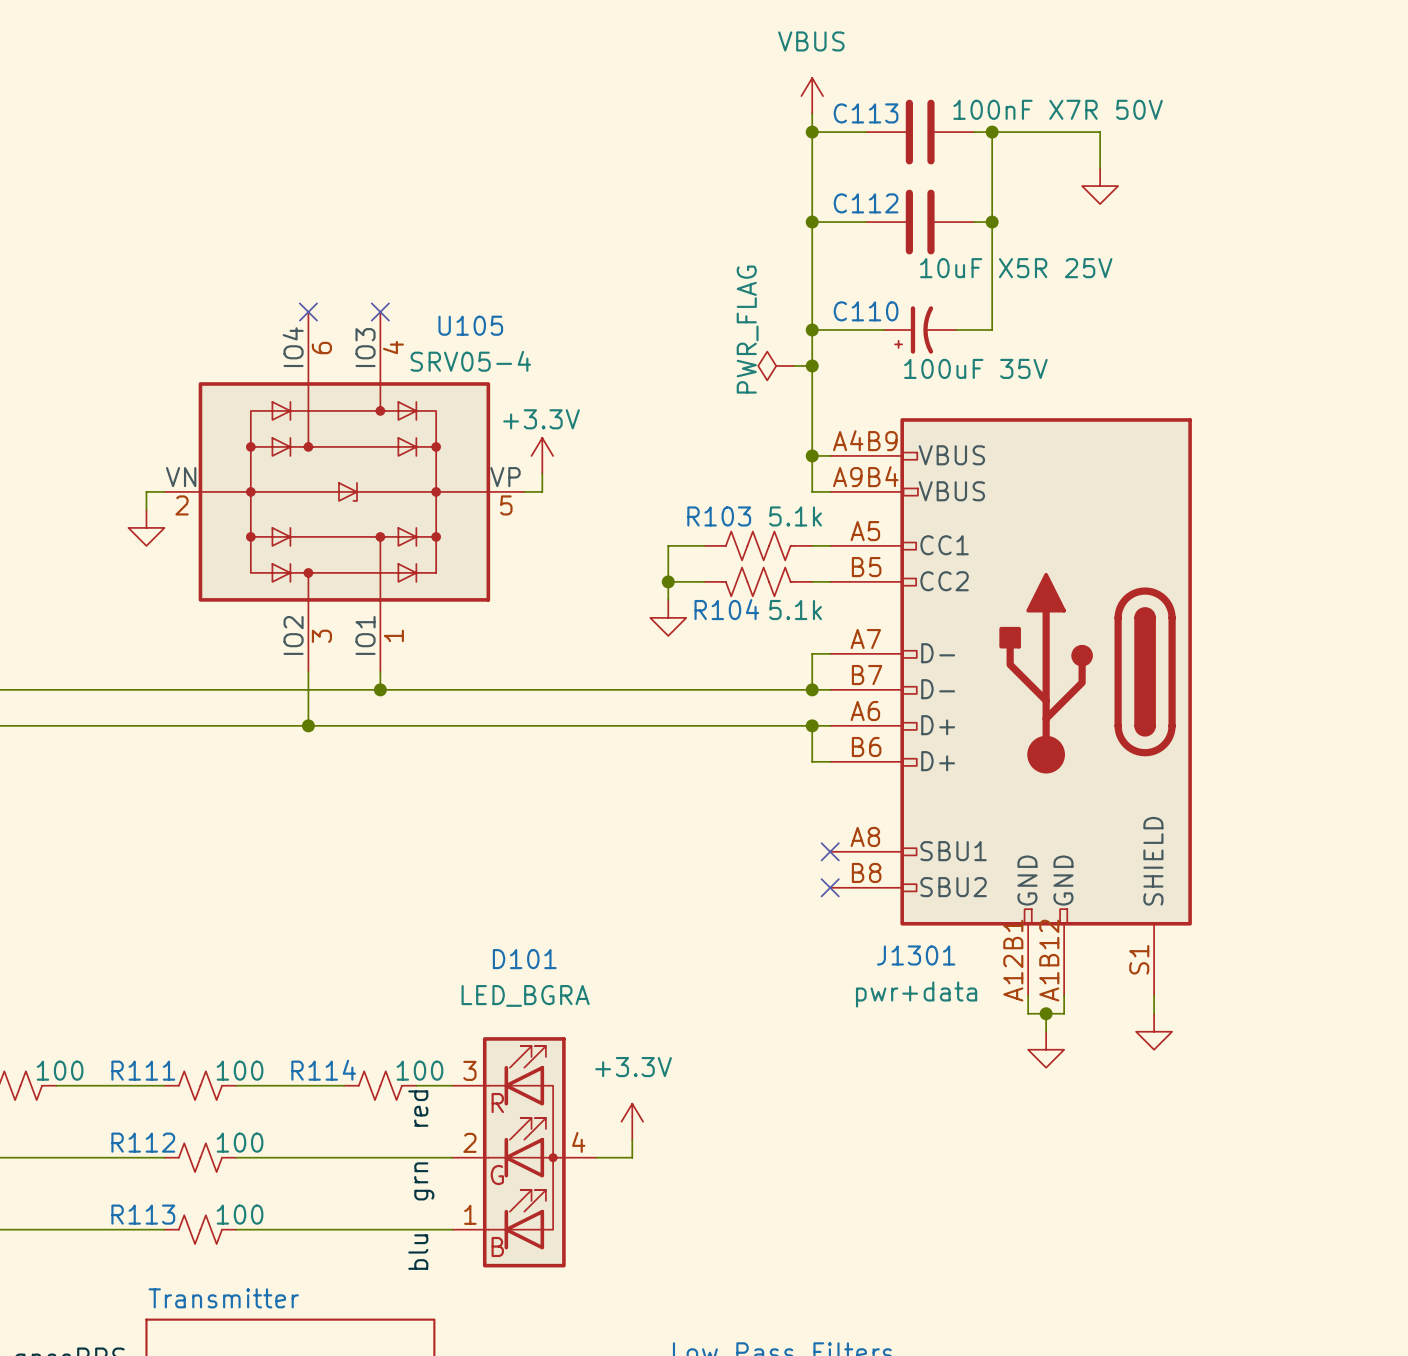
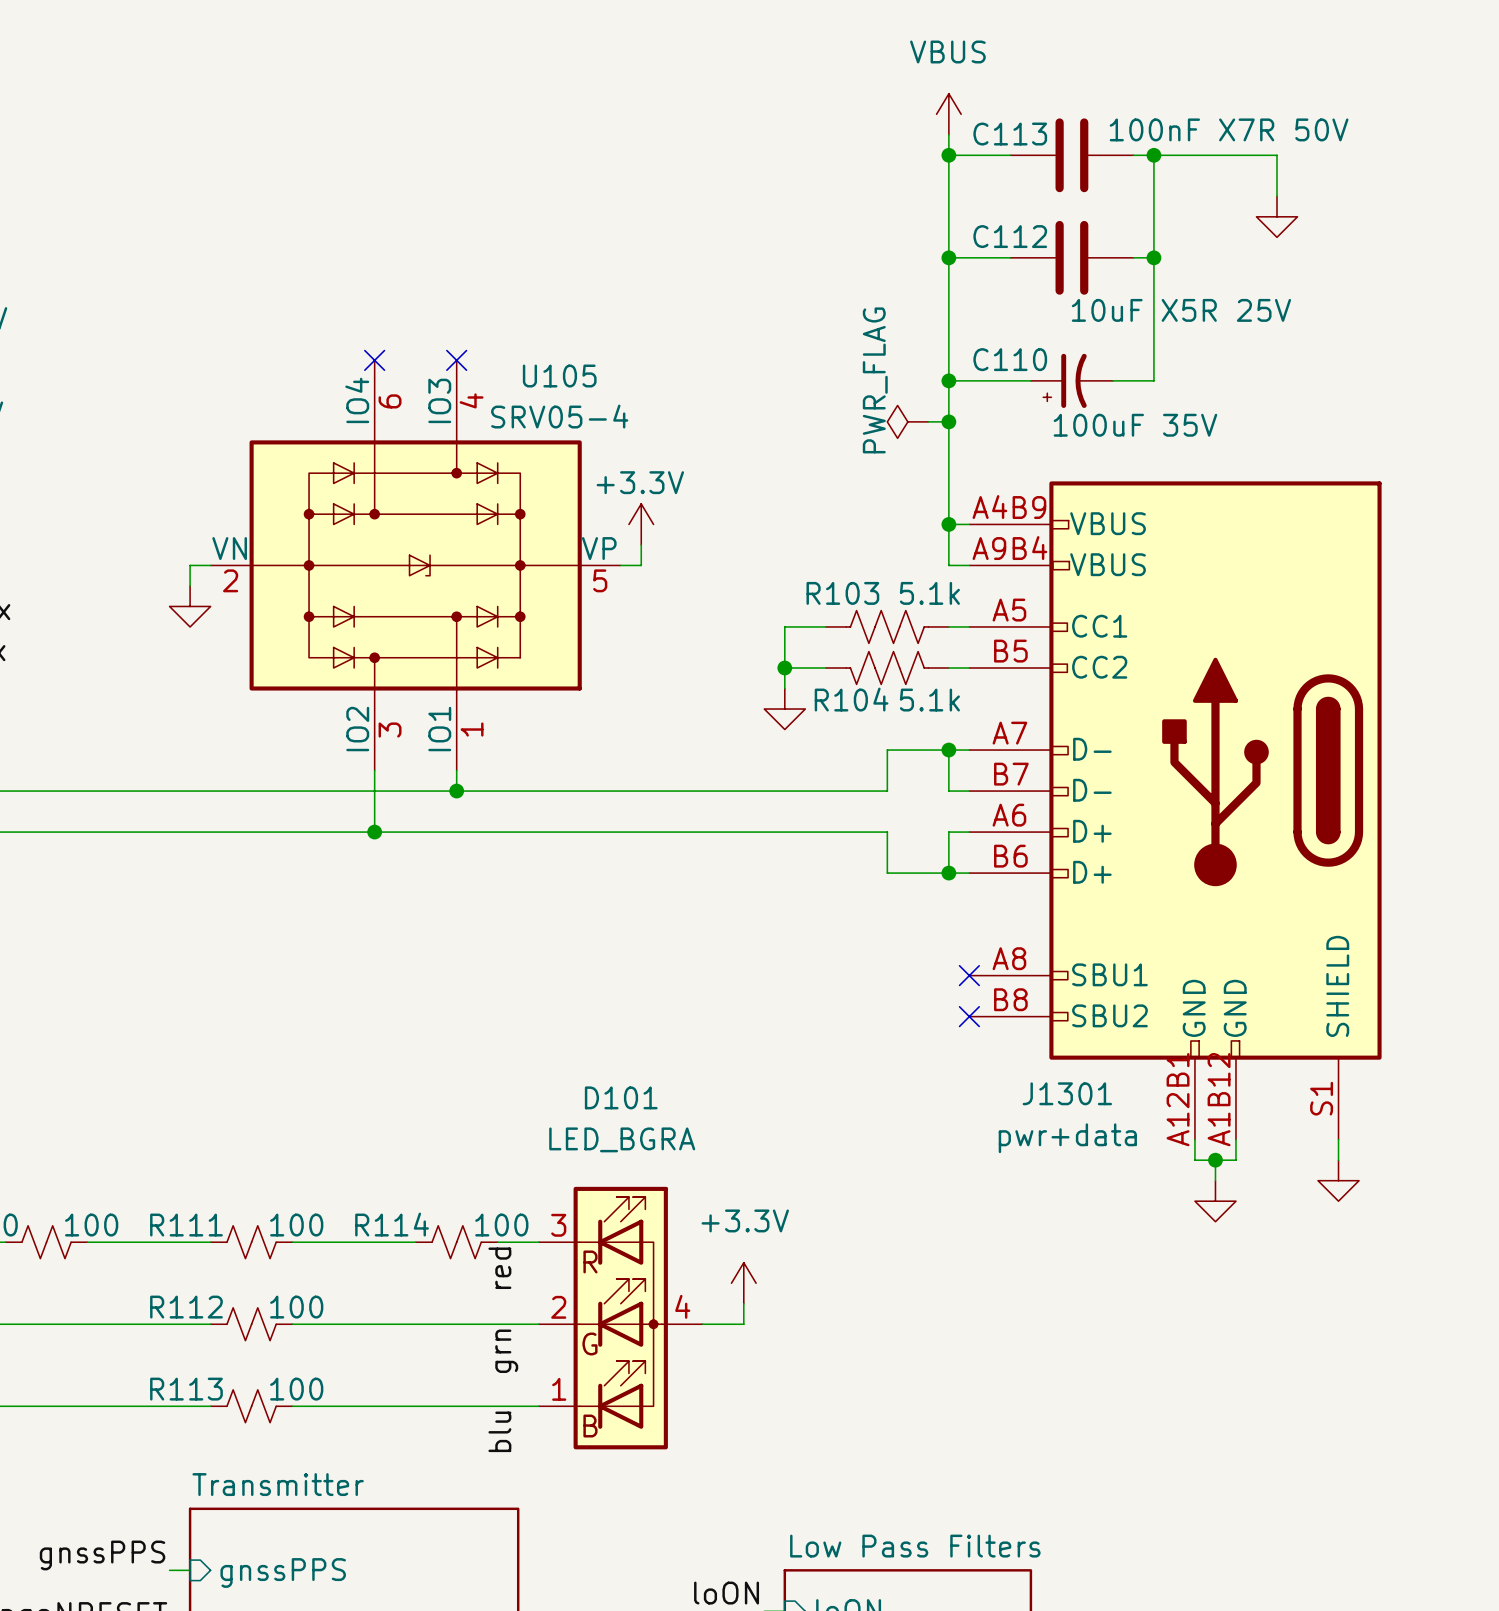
junction: none -> (948, 750)
wire: (758, 689) (812, 689) -> (887, 791) (887, 750) (948, 750)
junction: (812, 689) -> none
wire: (758, 725) (812, 725) -> (887, 832) (887, 873) (948, 873)
junction: (812, 725) -> none
junction: none -> (948, 873)

